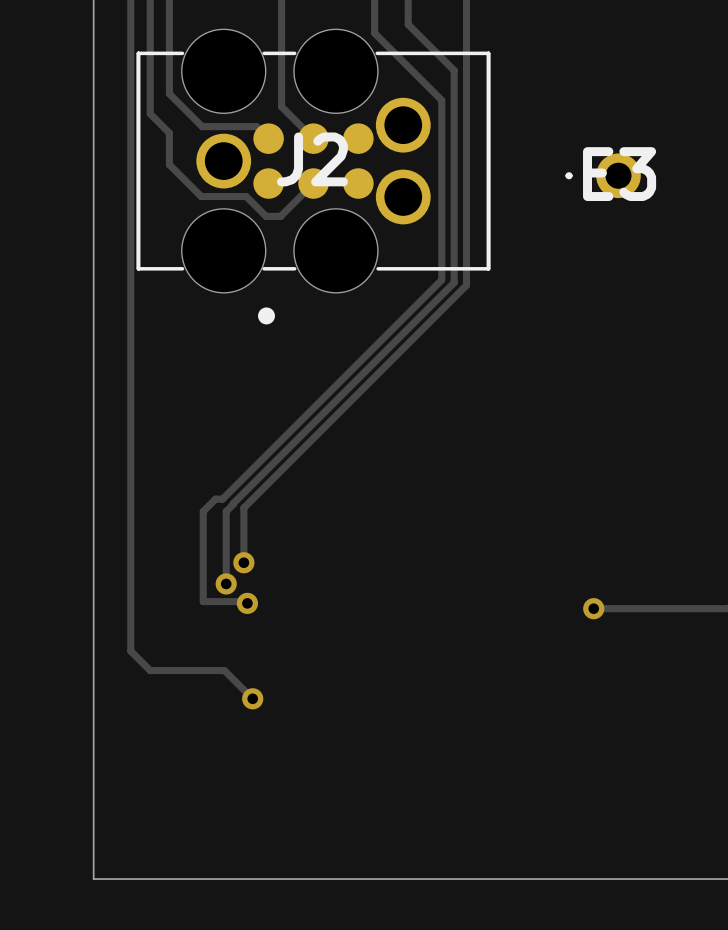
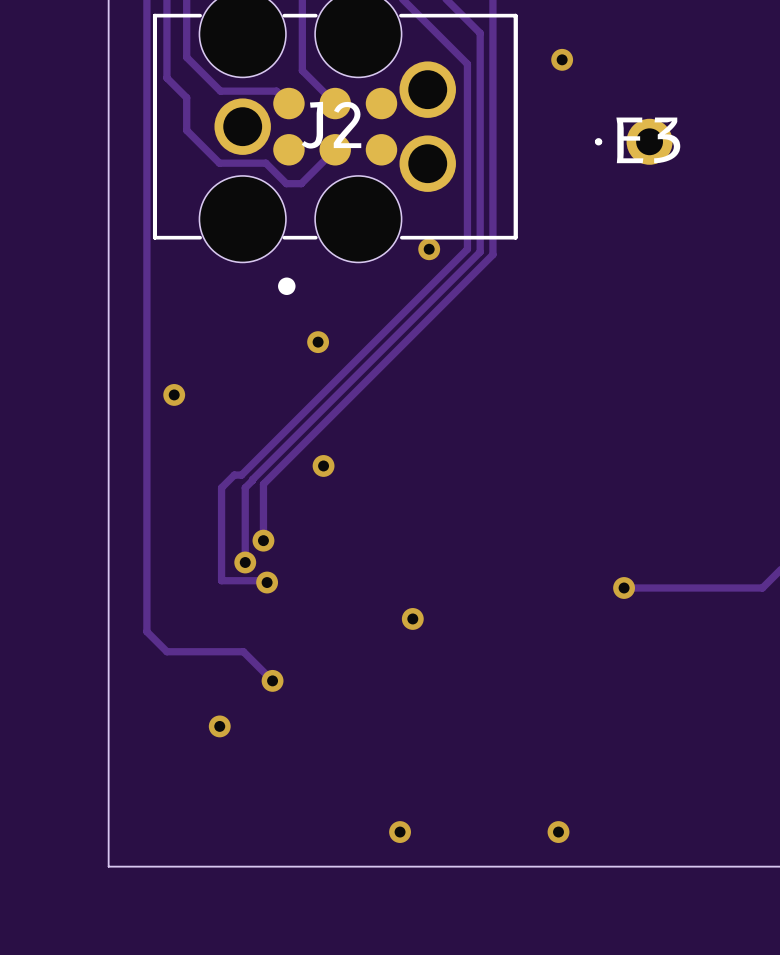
via: none -> (562, 59)
via: none -> (429, 249)
via: none -> (318, 342)
via: none -> (174, 394)
via: none -> (323, 465)
via: none -> (412, 618)
via: none -> (219, 726)
via: none -> (400, 832)
via: none -> (558, 832)

